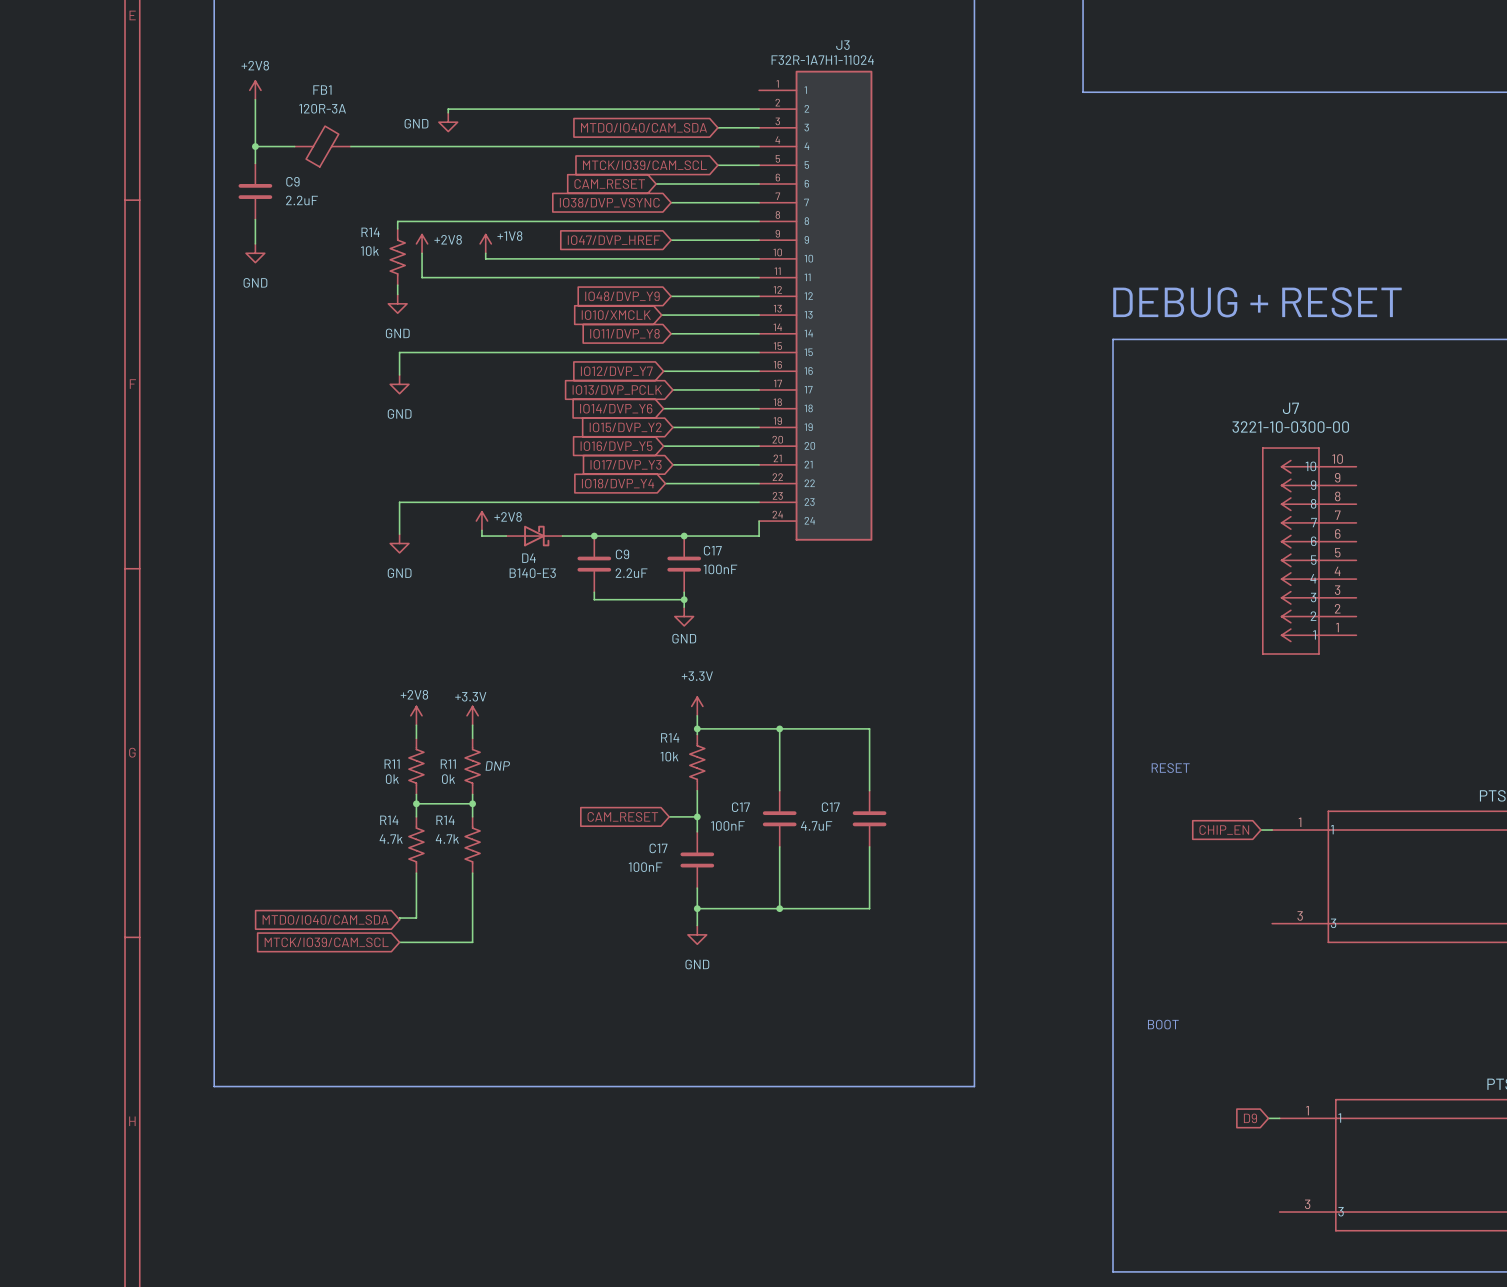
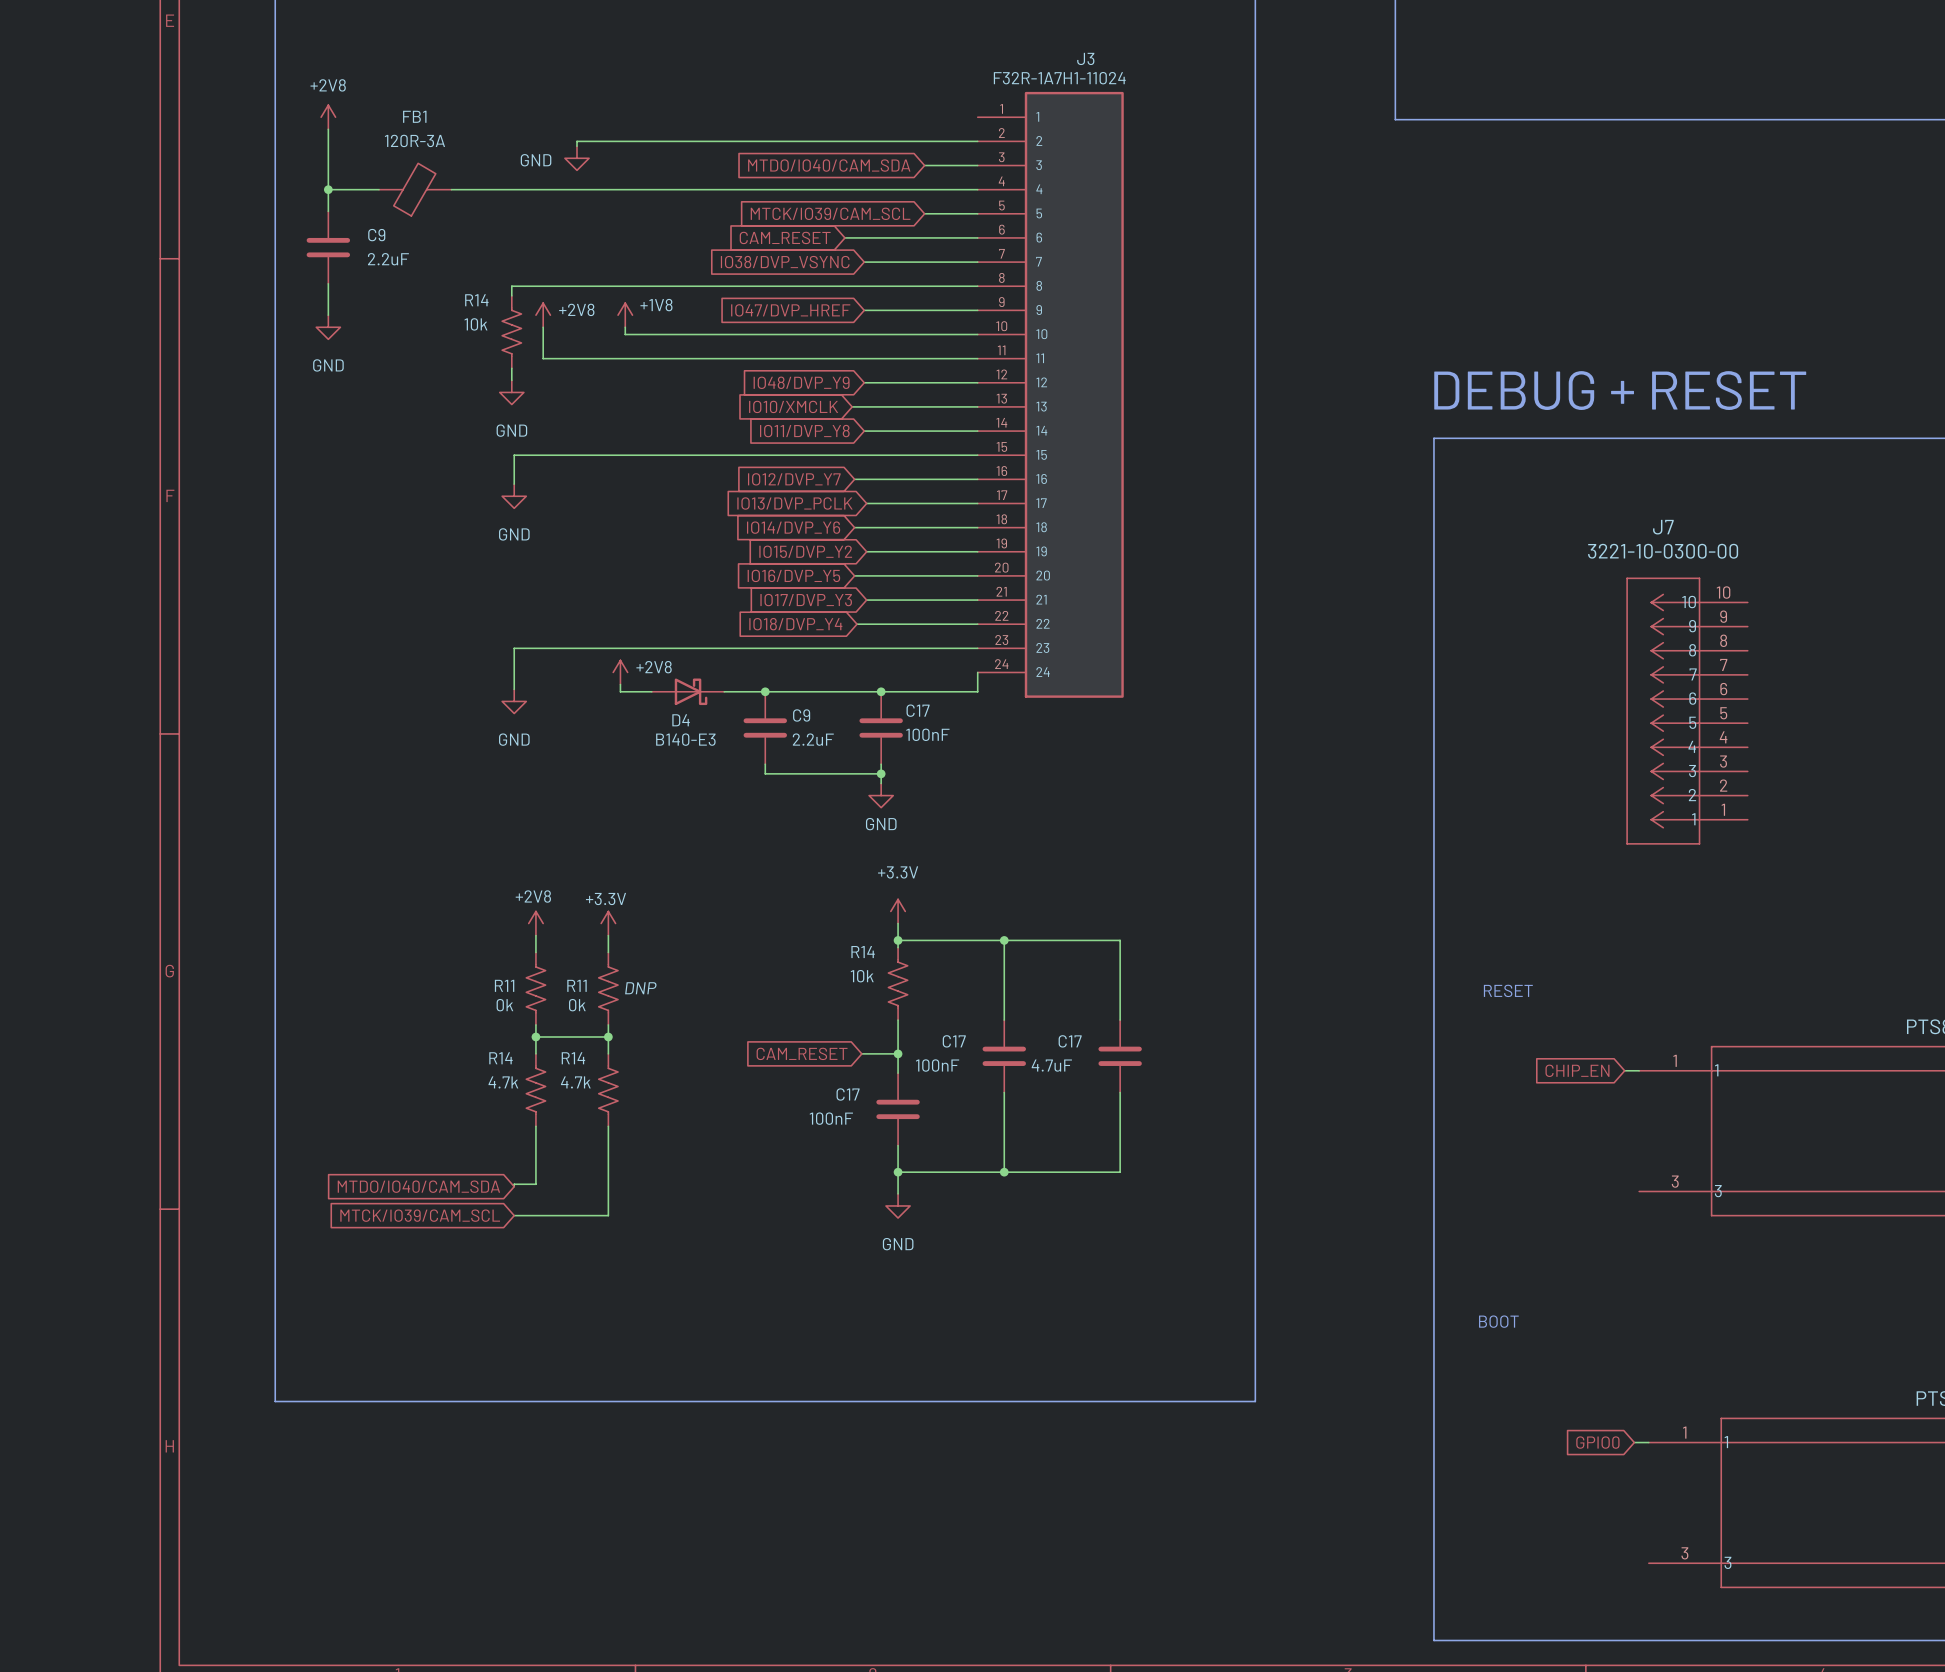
global label: D9 (1250, 1118) -> GPIO0 (1597, 1442)

